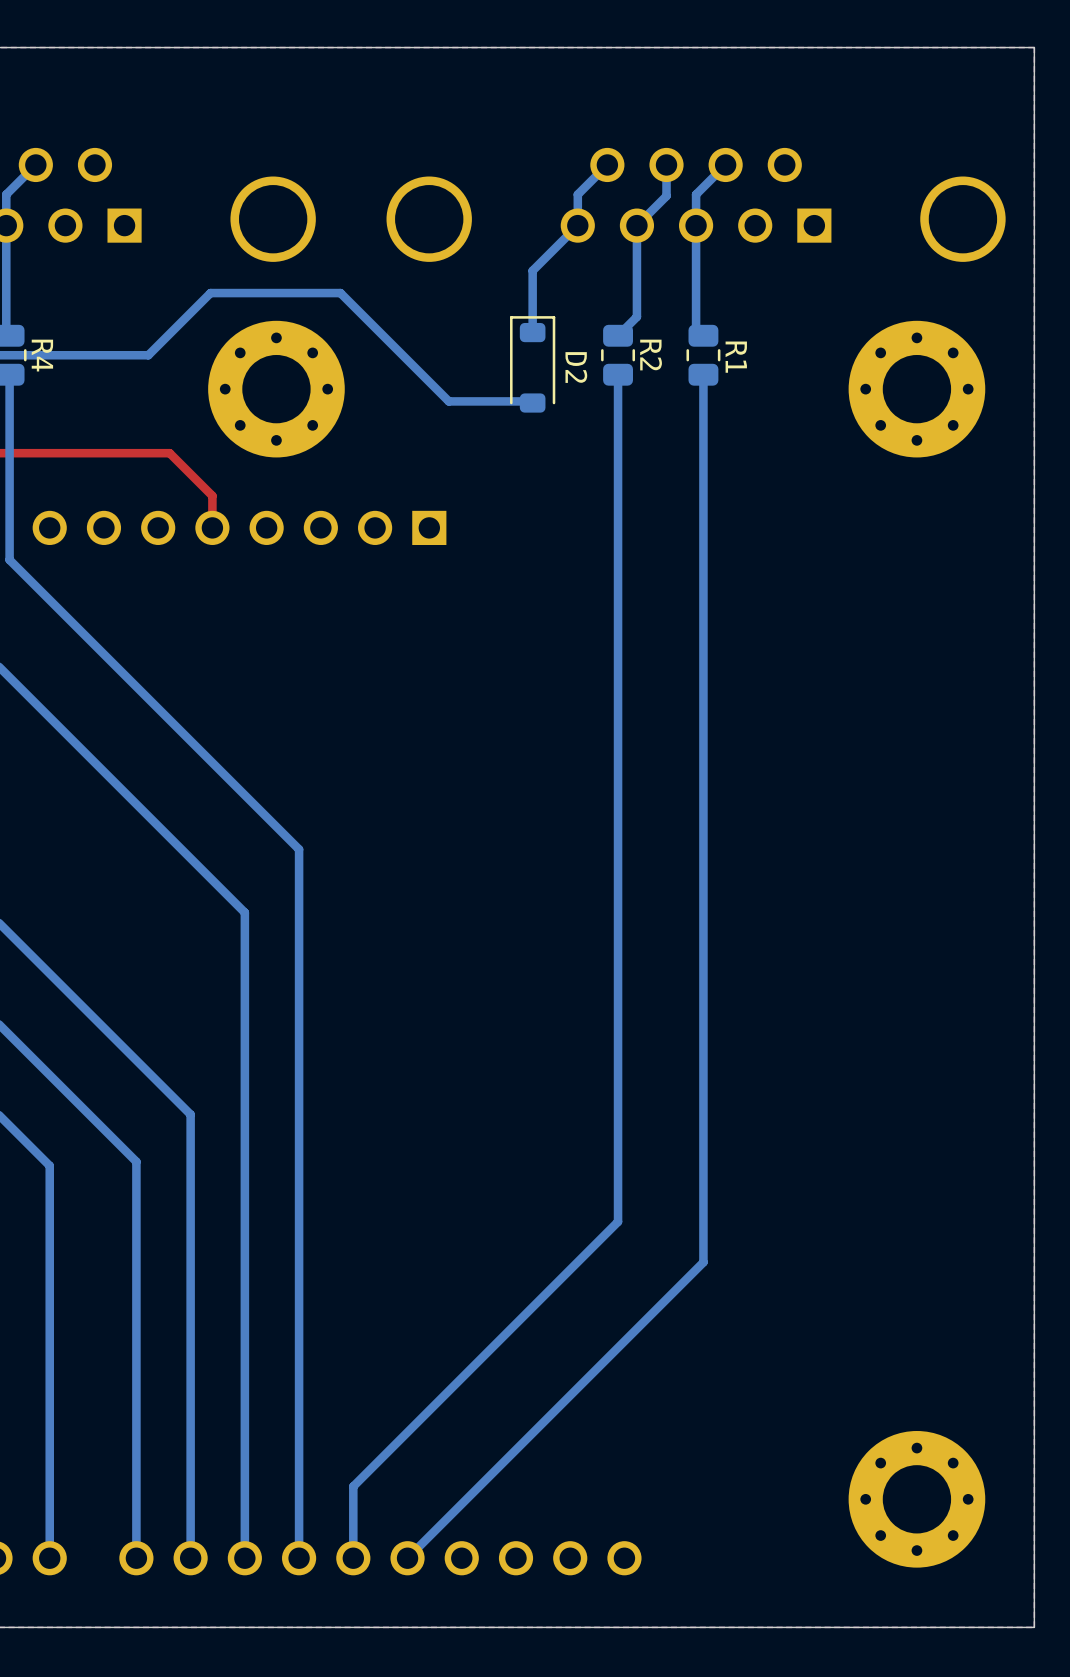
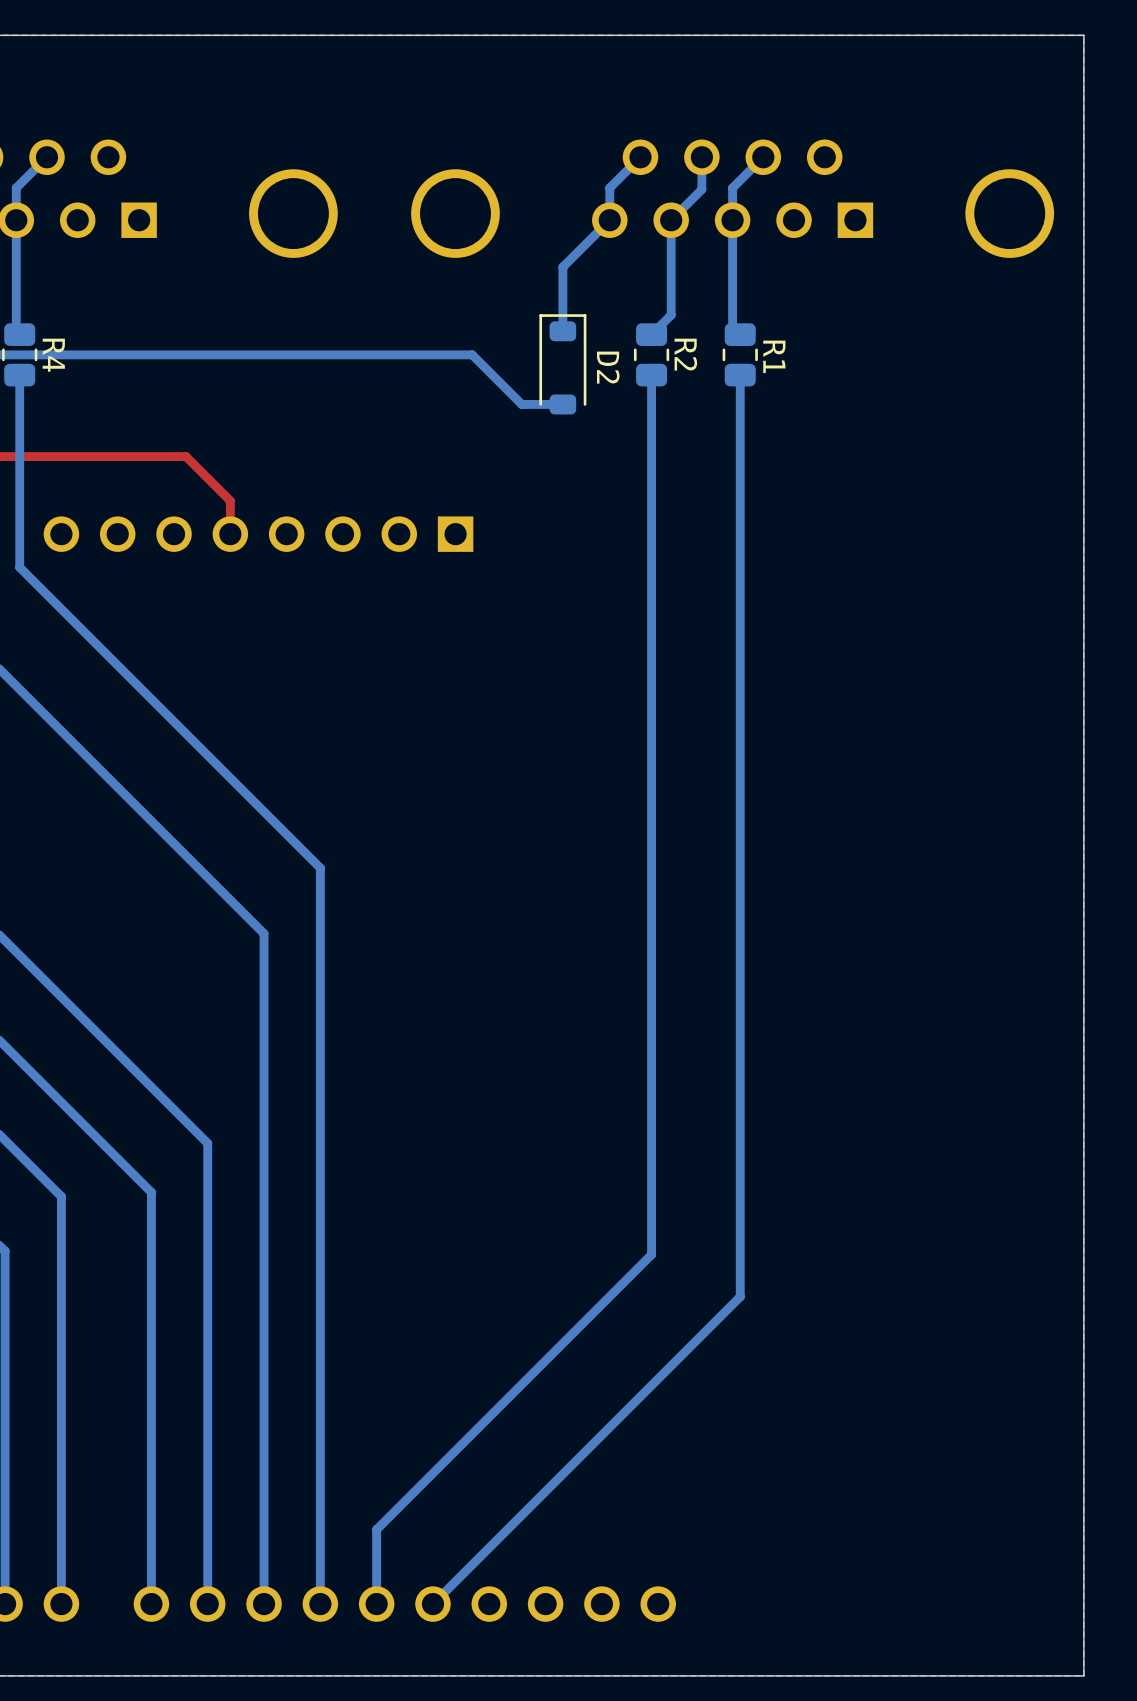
bottom track: (148, 355) (210, 293) (340, 293) (448, 401) (531, 401) (532, 403) -> (163, 354) (472, 354) (521, 404) (562, 404)
part: (276, 389) -> none
part: (916, 389) -> none
part: (916, 1499) -> none

